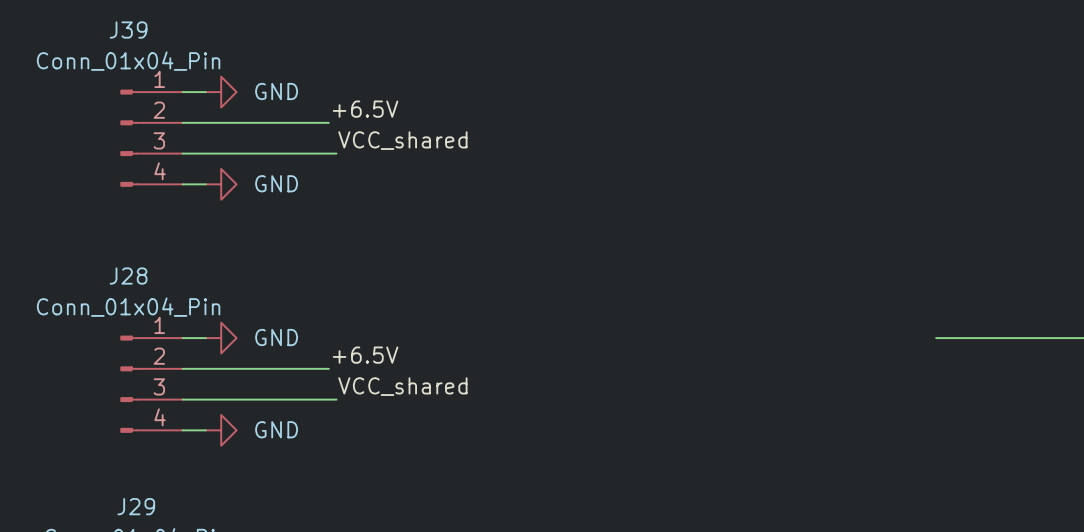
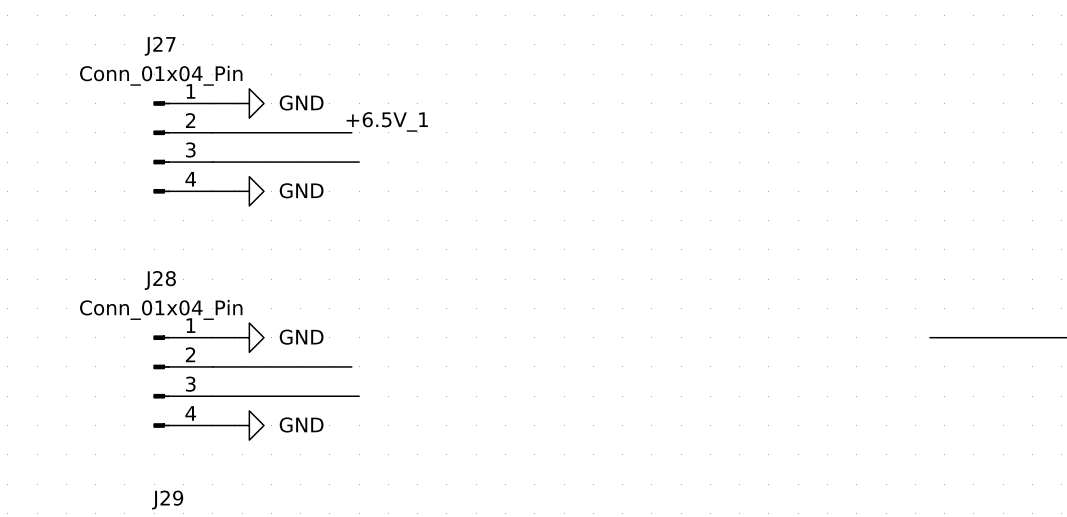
J39 name: J39 (128, 30) -> J27 (160, 46)
label: +6.5V (365, 109) -> +6.5V_1 (387, 121)
label: VCC_shared (402, 140) -> none
label: +6.5V (365, 355) -> none
label: VCC_shared (402, 386) -> none

